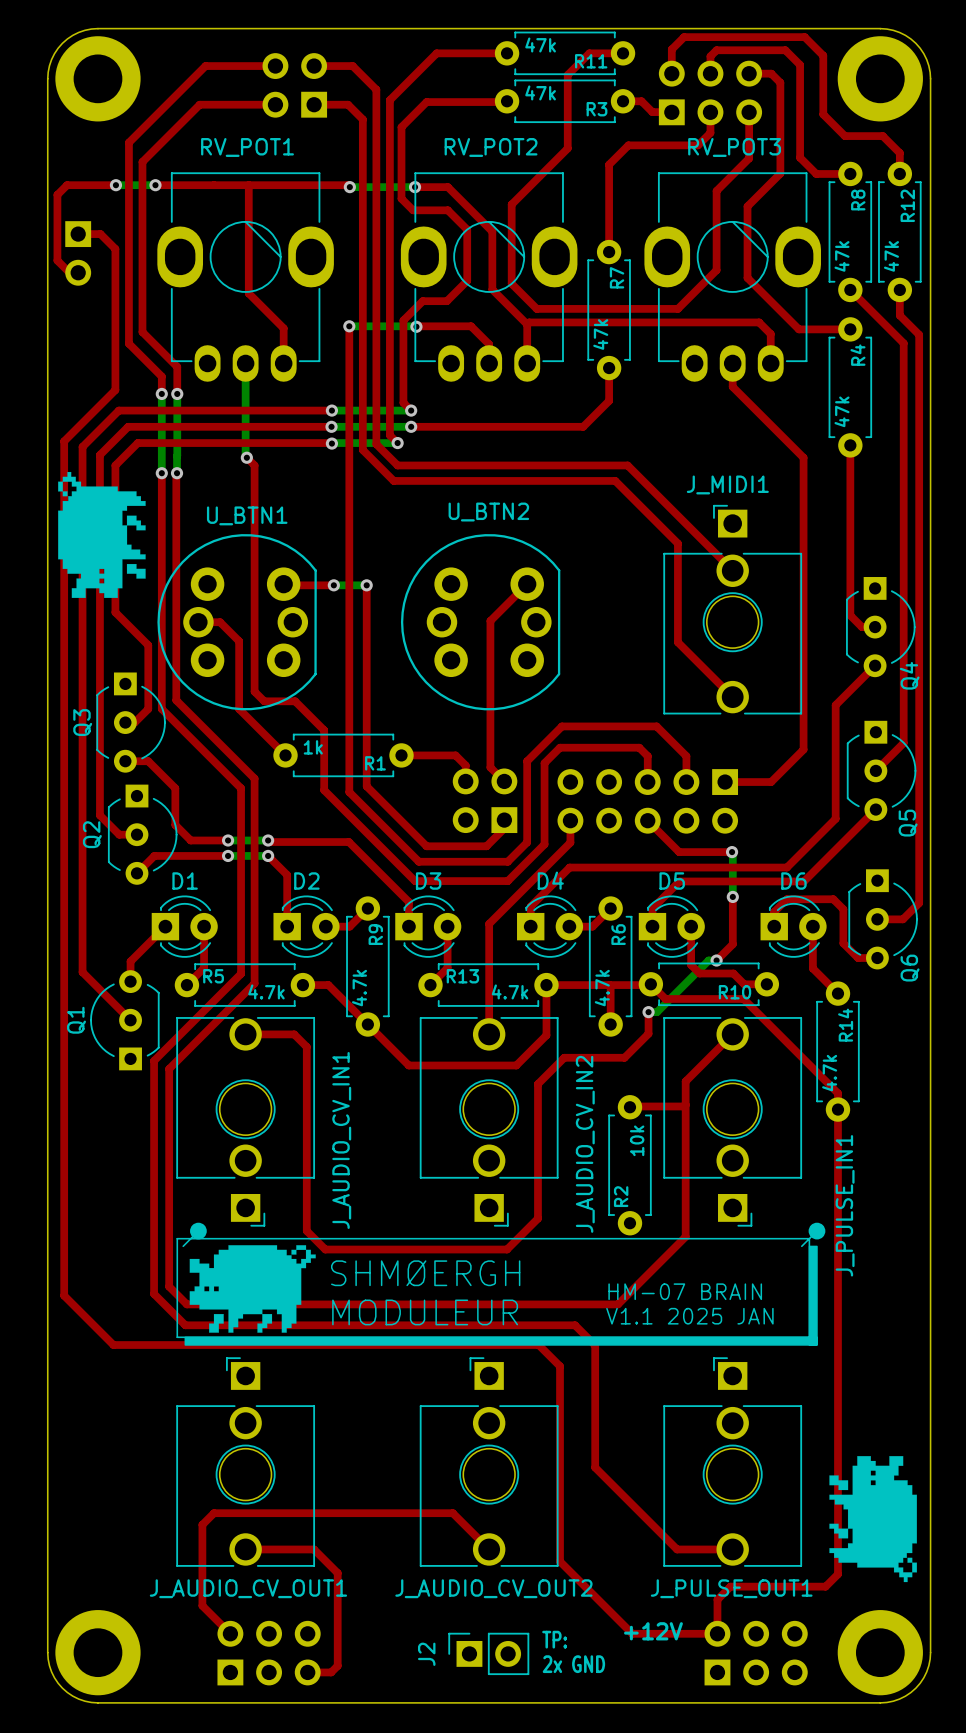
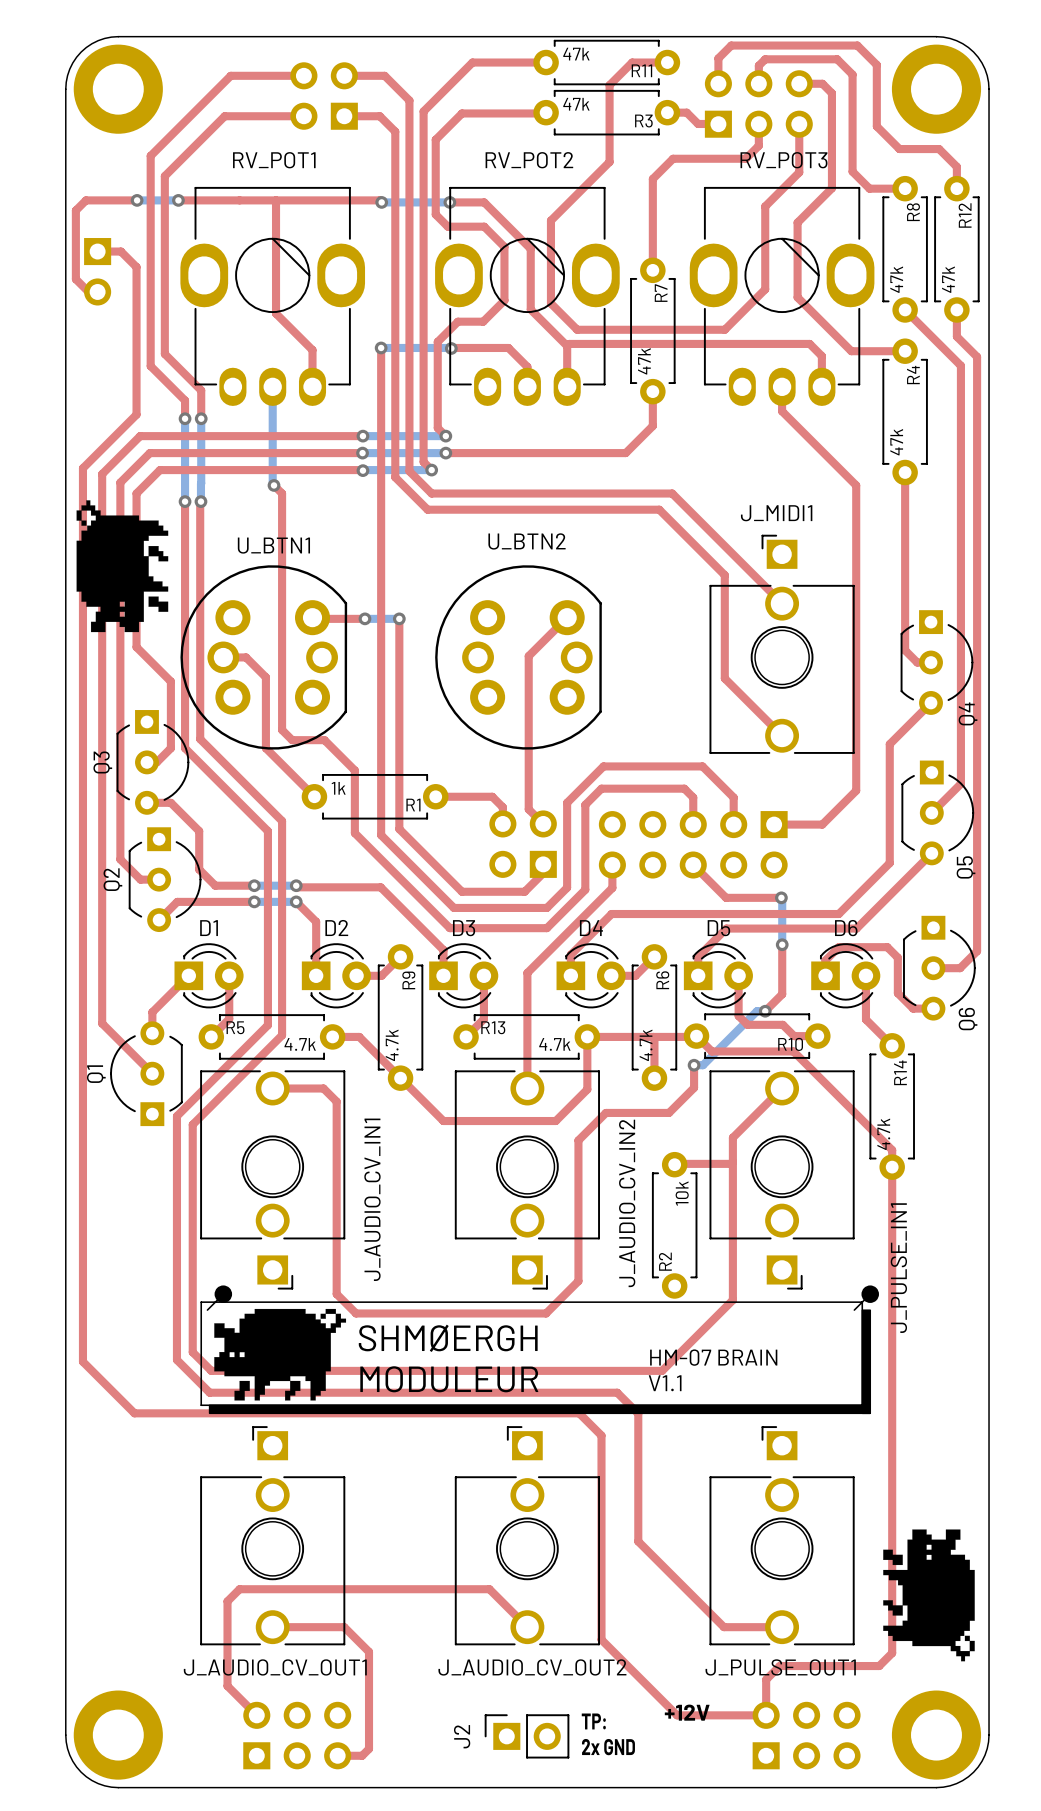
text: V1.1 2025 JAN (689, 1316) -> V1.1 (665, 1383)

